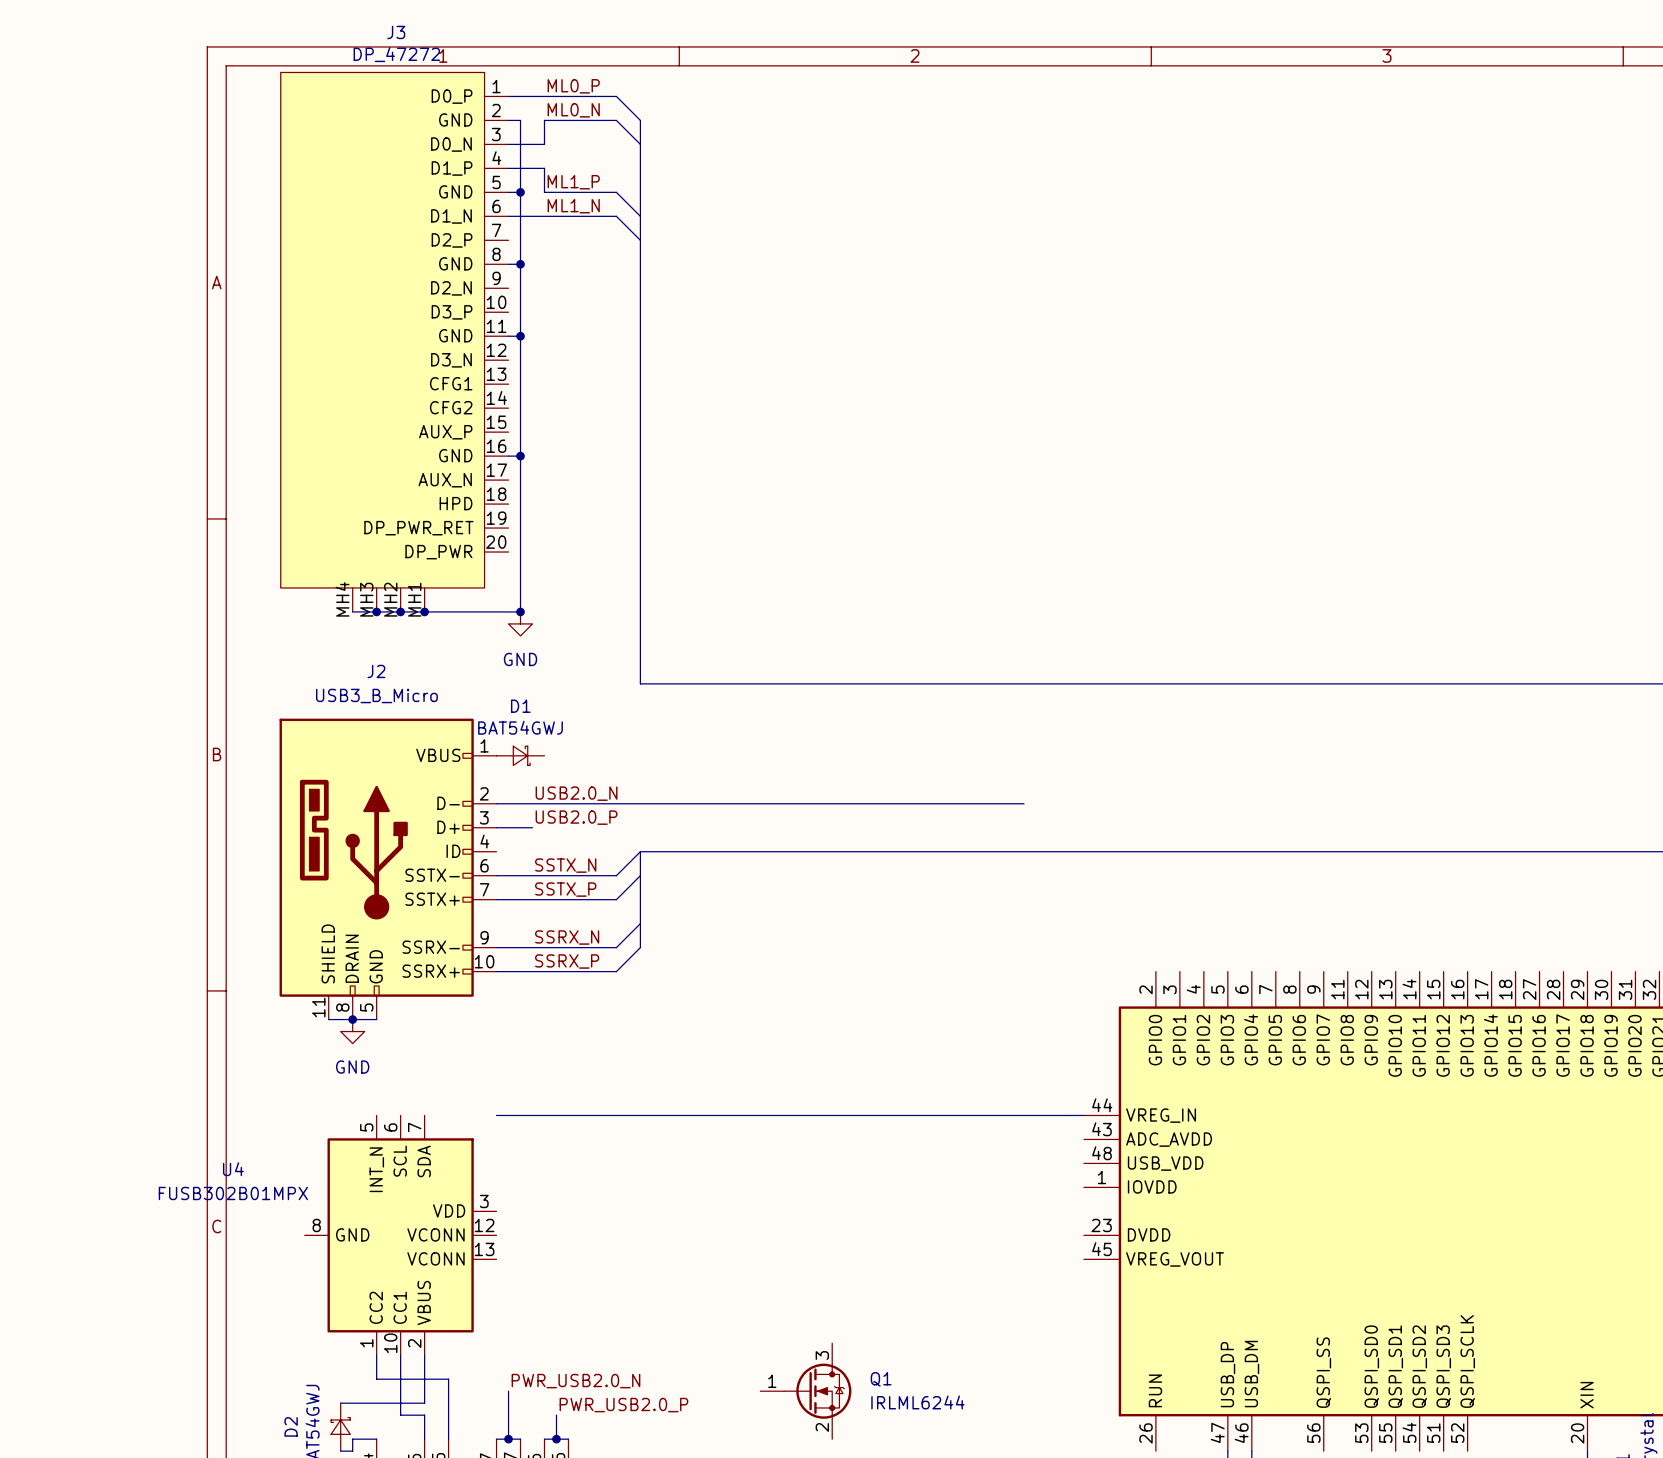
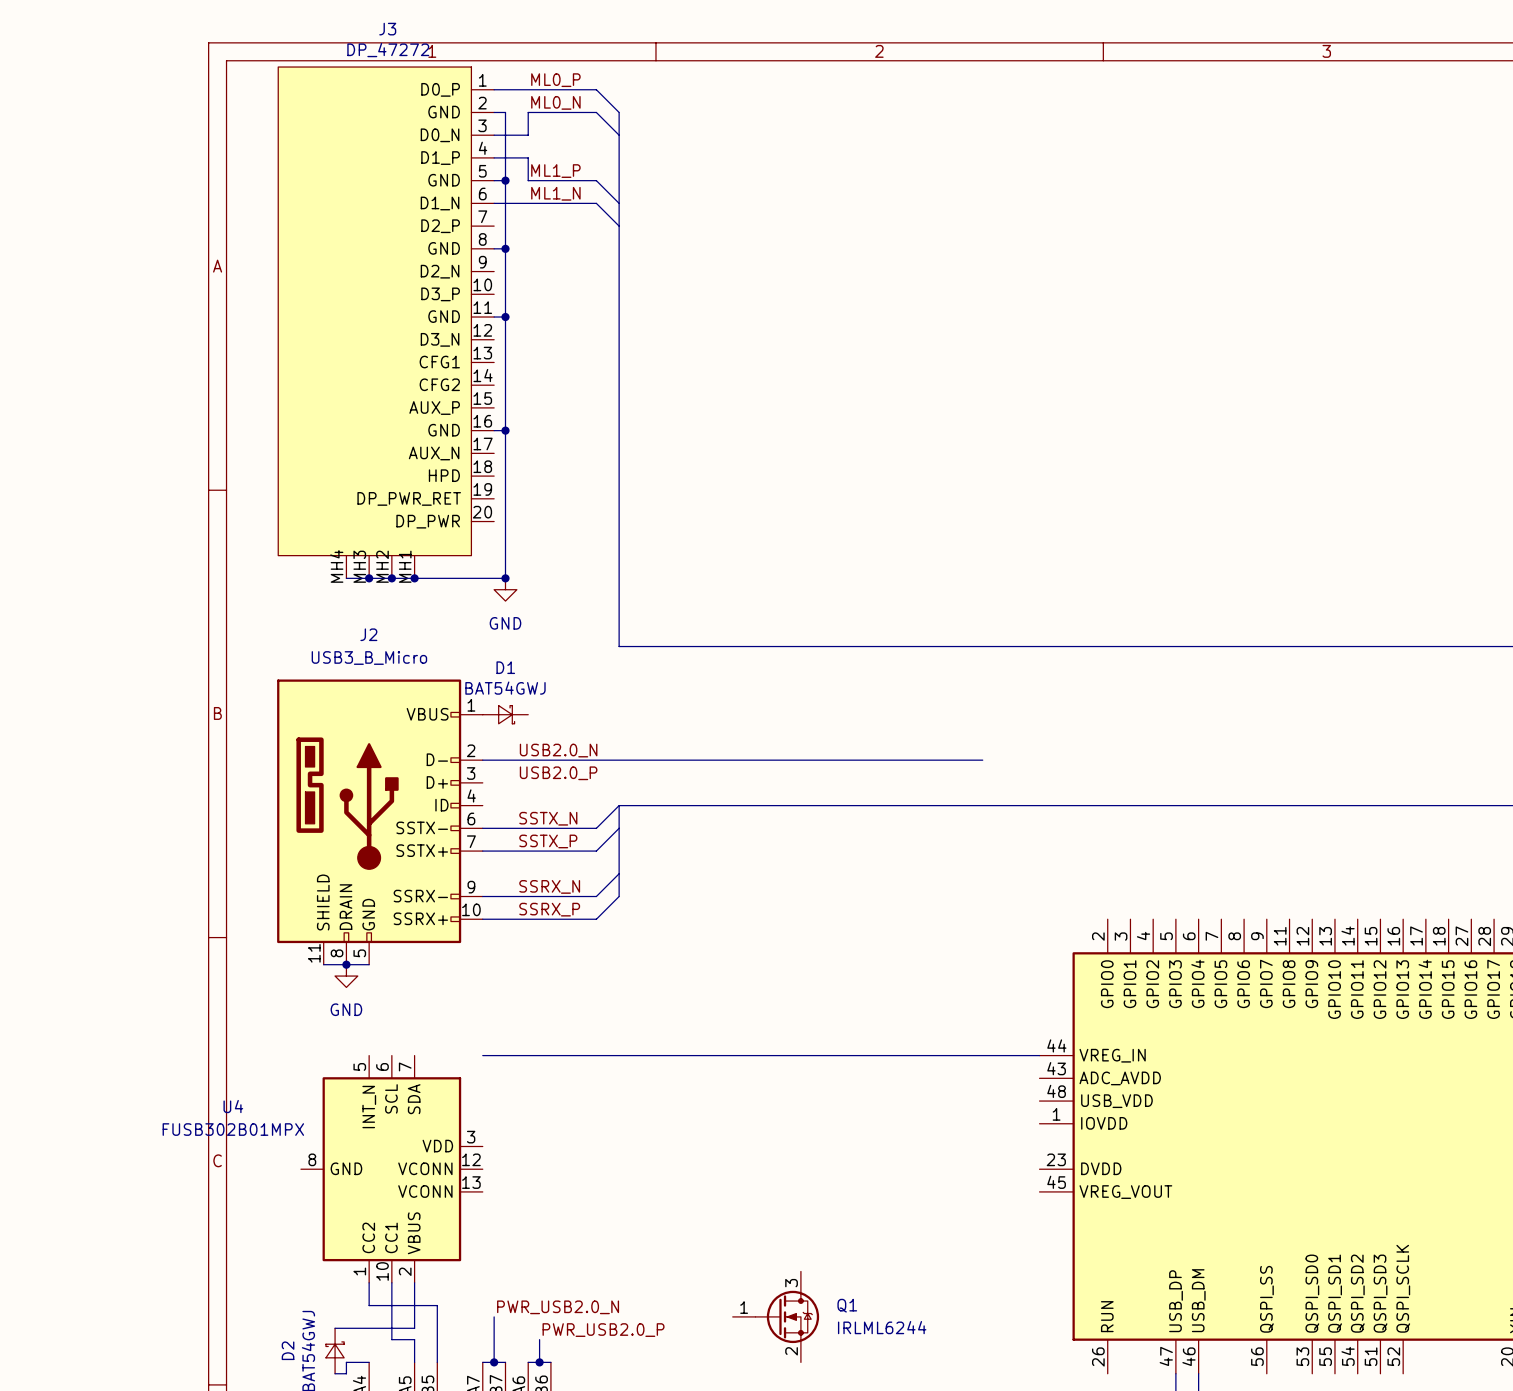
wire: (496, 827) (532, 827) -> none

